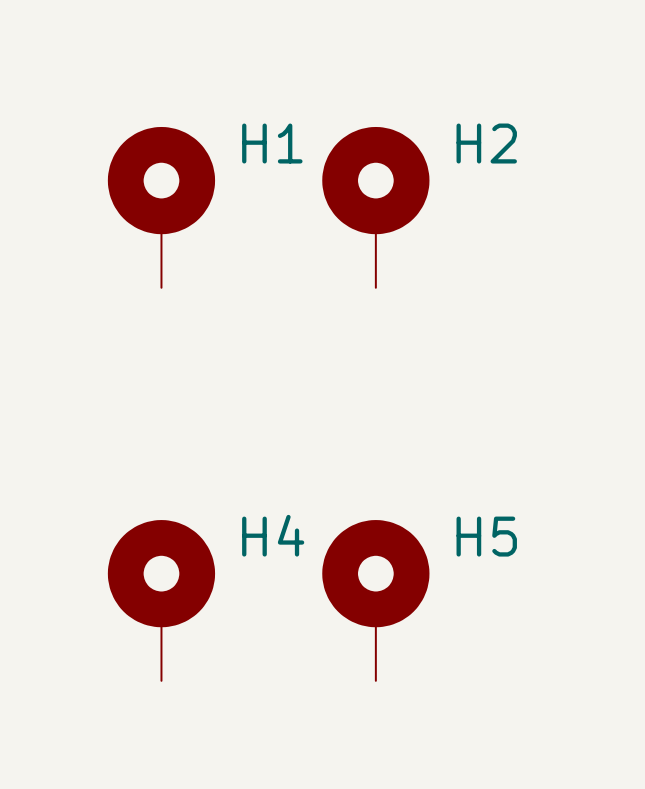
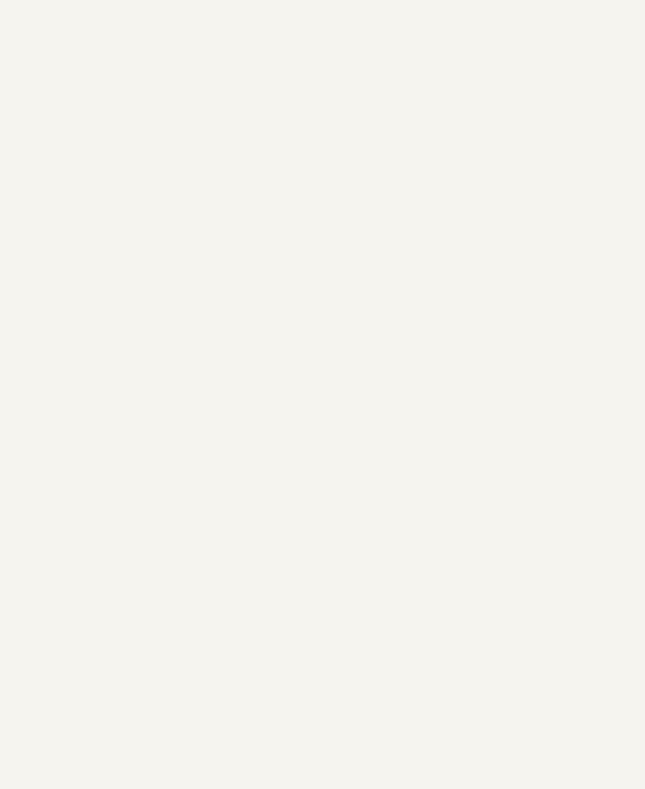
H1: (161, 207) -> none
H2: (375, 207) -> none
H4: (161, 600) -> none
H5: (375, 600) -> none

